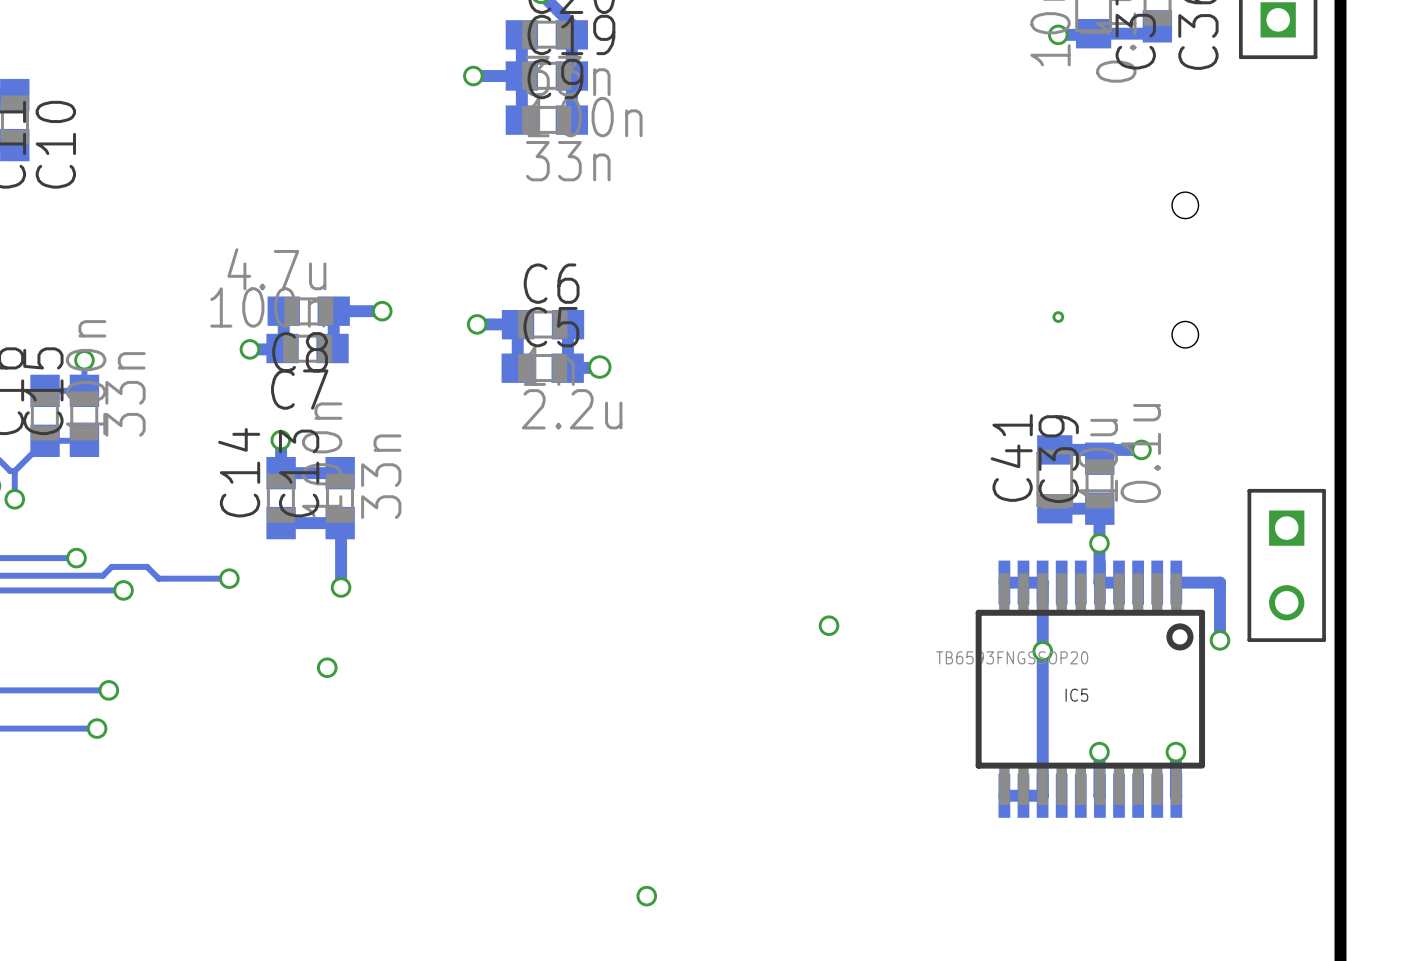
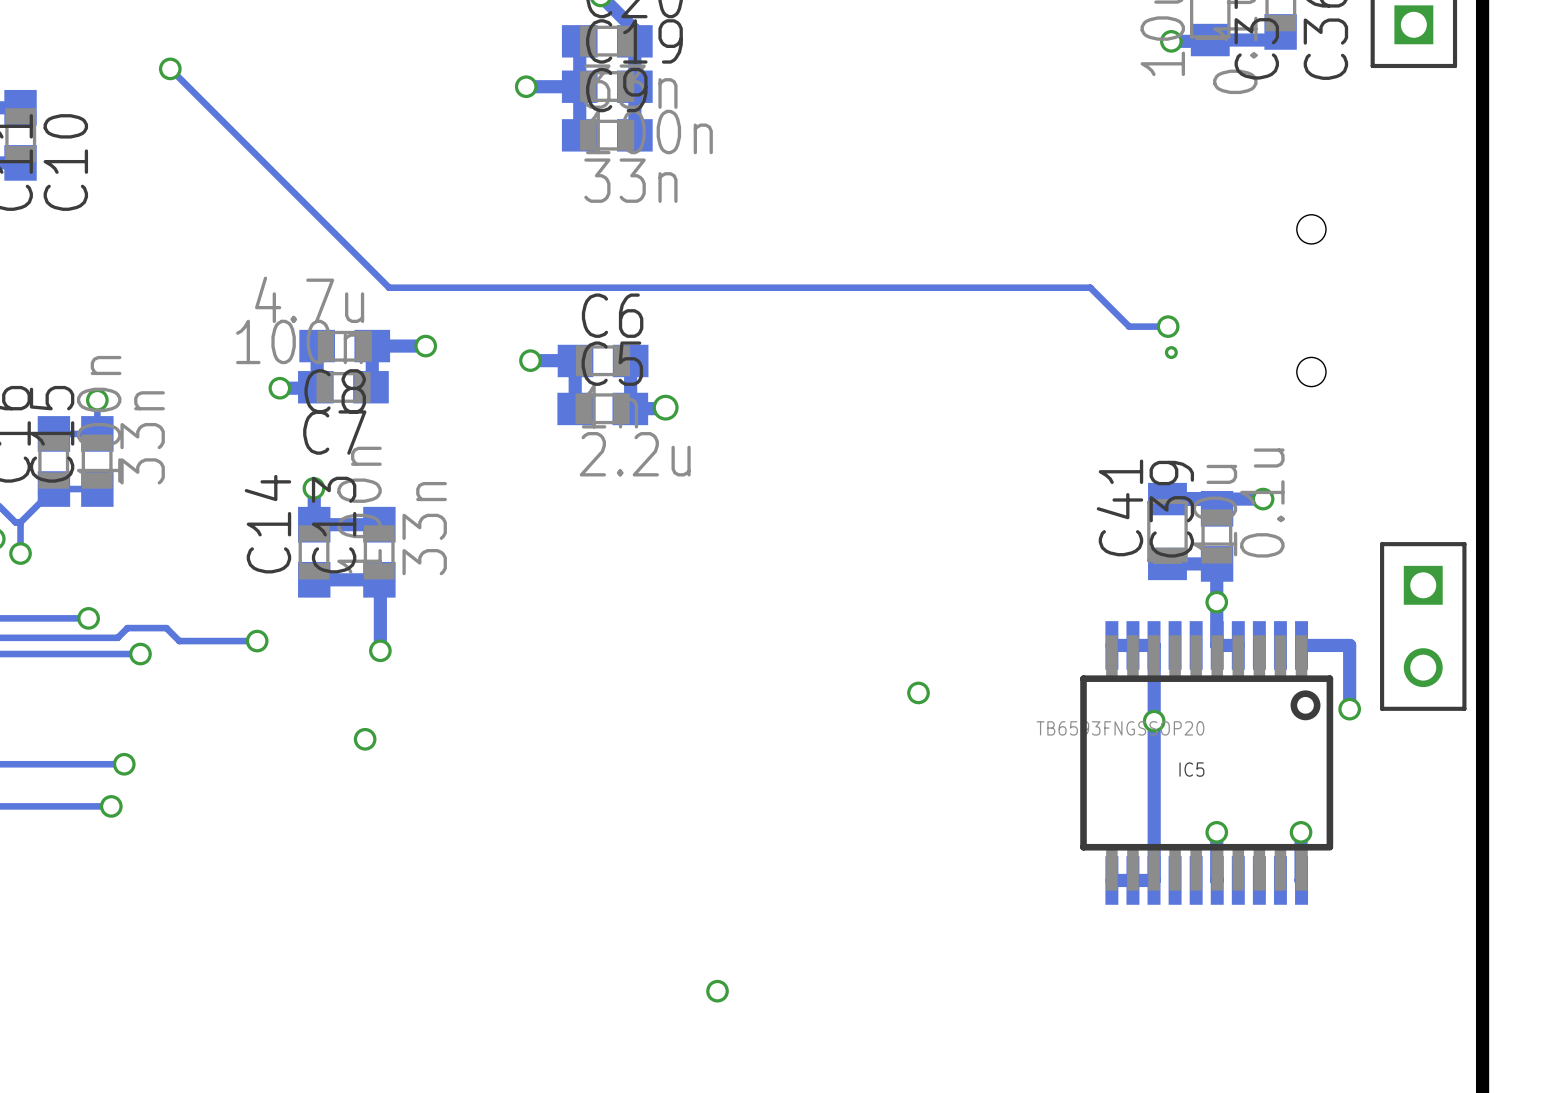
track: none -> (170, 68) (389, 287) (1090, 287) (1129, 326) (1168, 326)
via: none -> (170, 68)
via: none -> (1168, 326)

